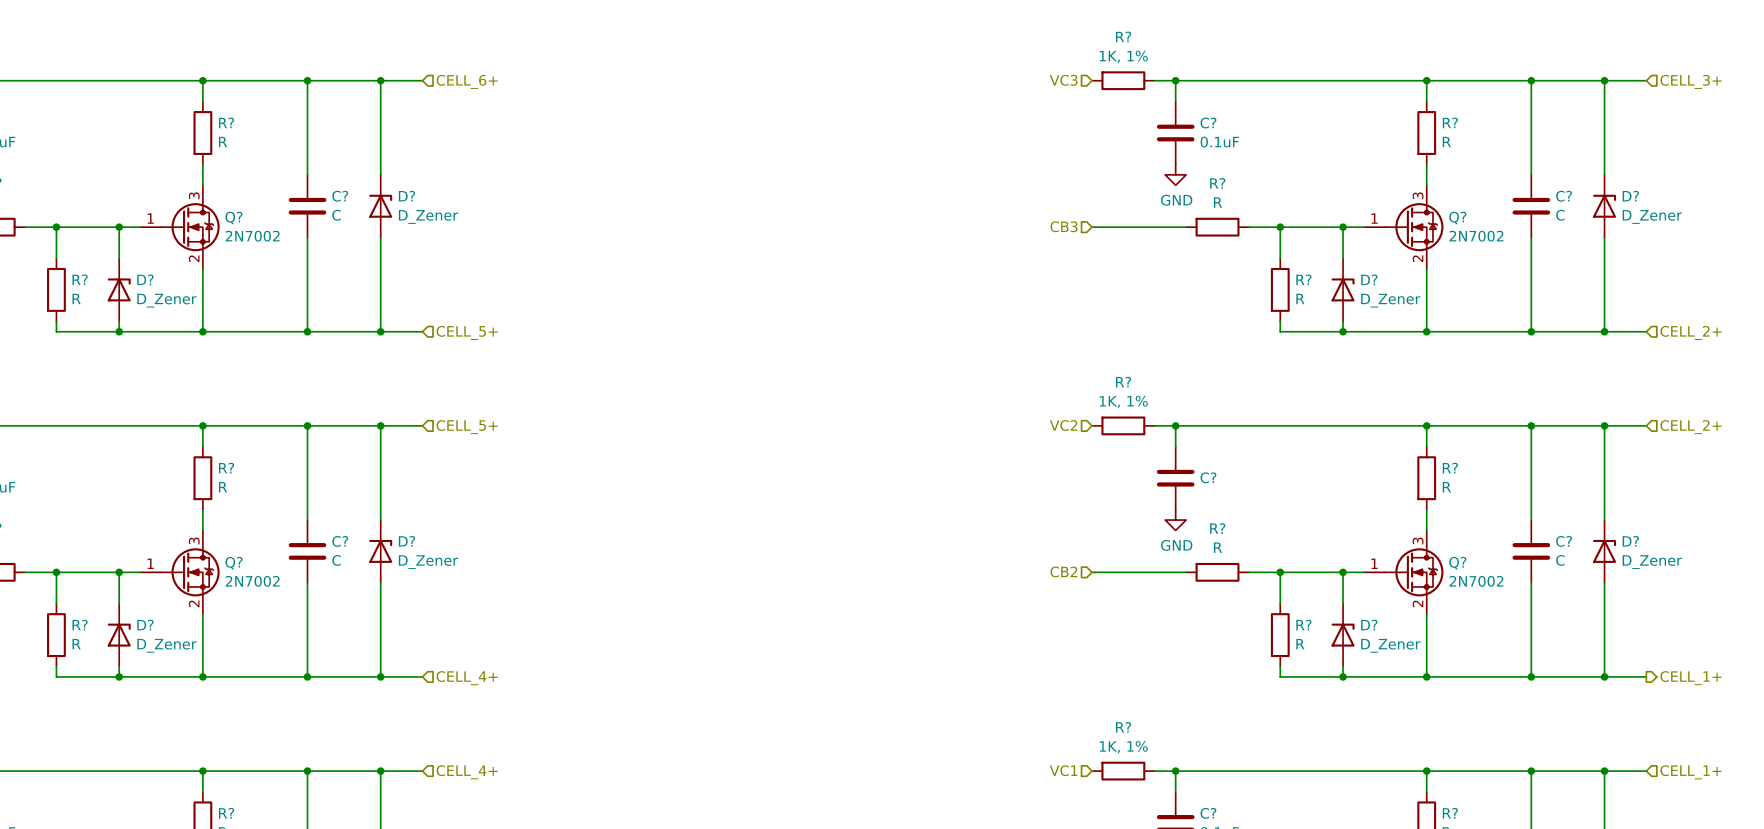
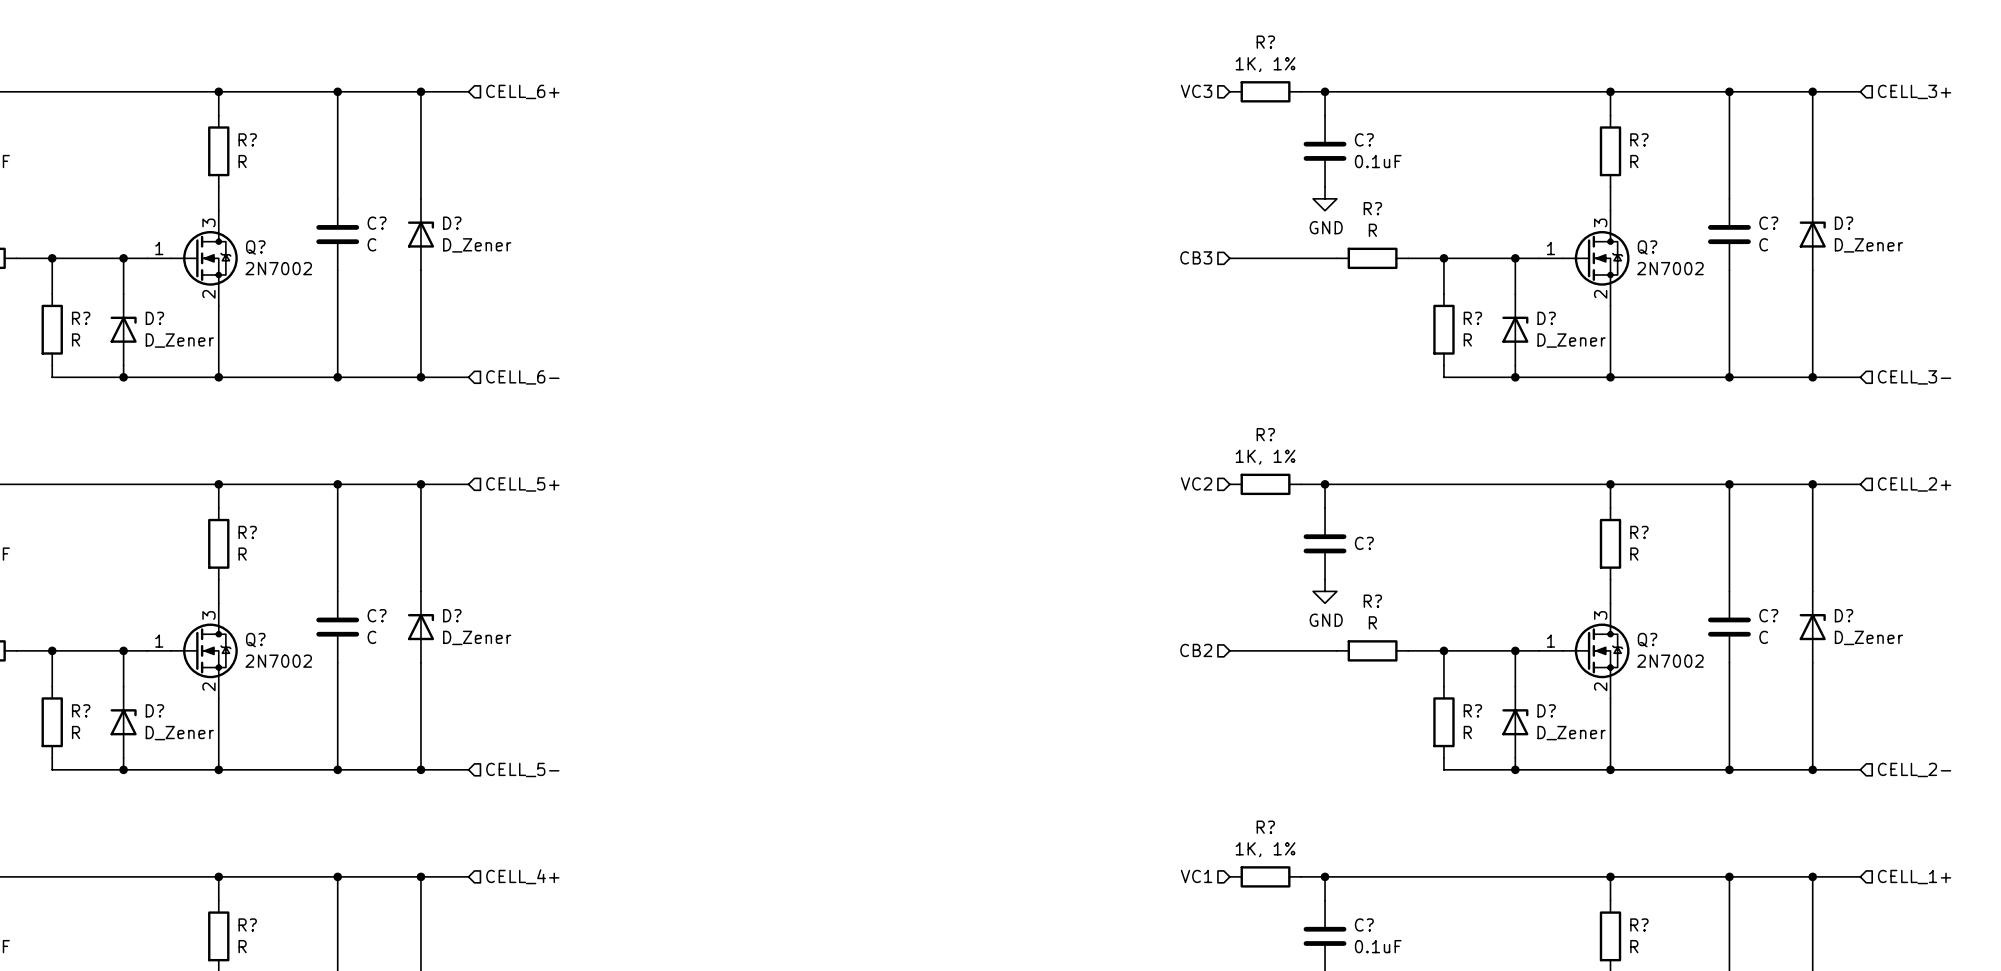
hierarchical label: CELL_5+ (467, 332) -> CELL_6- (522, 377)
hierarchical label: CELL_2+ (1691, 332) -> CELL_3- (1914, 377)
hierarchical label: CELL_4+ (467, 678) -> CELL_5- (522, 769)
hierarchical label shape: output (1691, 678) -> input (1914, 769)
hierarchical label: CELL_1+ (1691, 678) -> CELL_2- (1914, 769)

